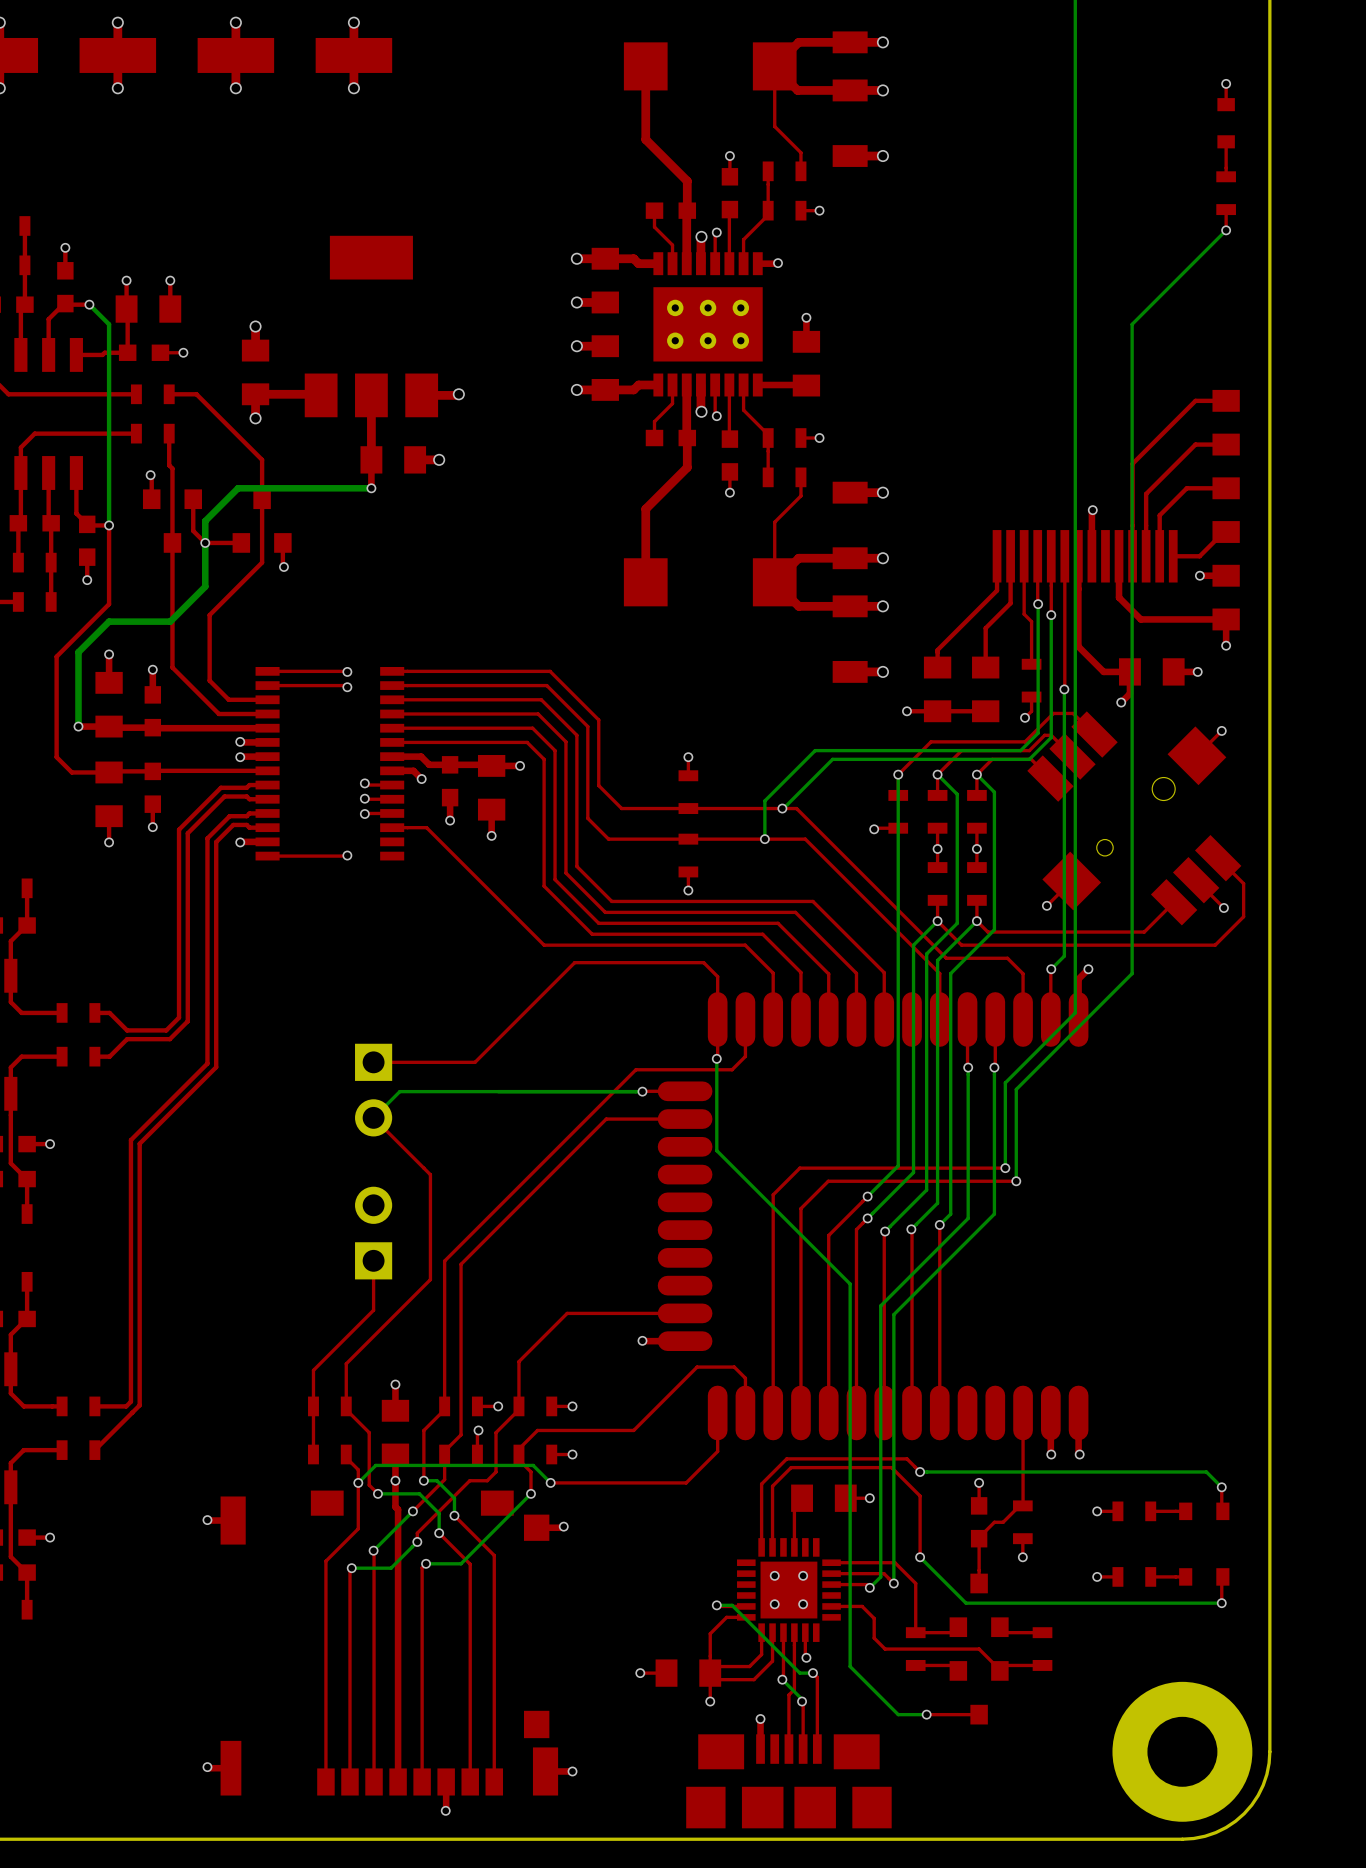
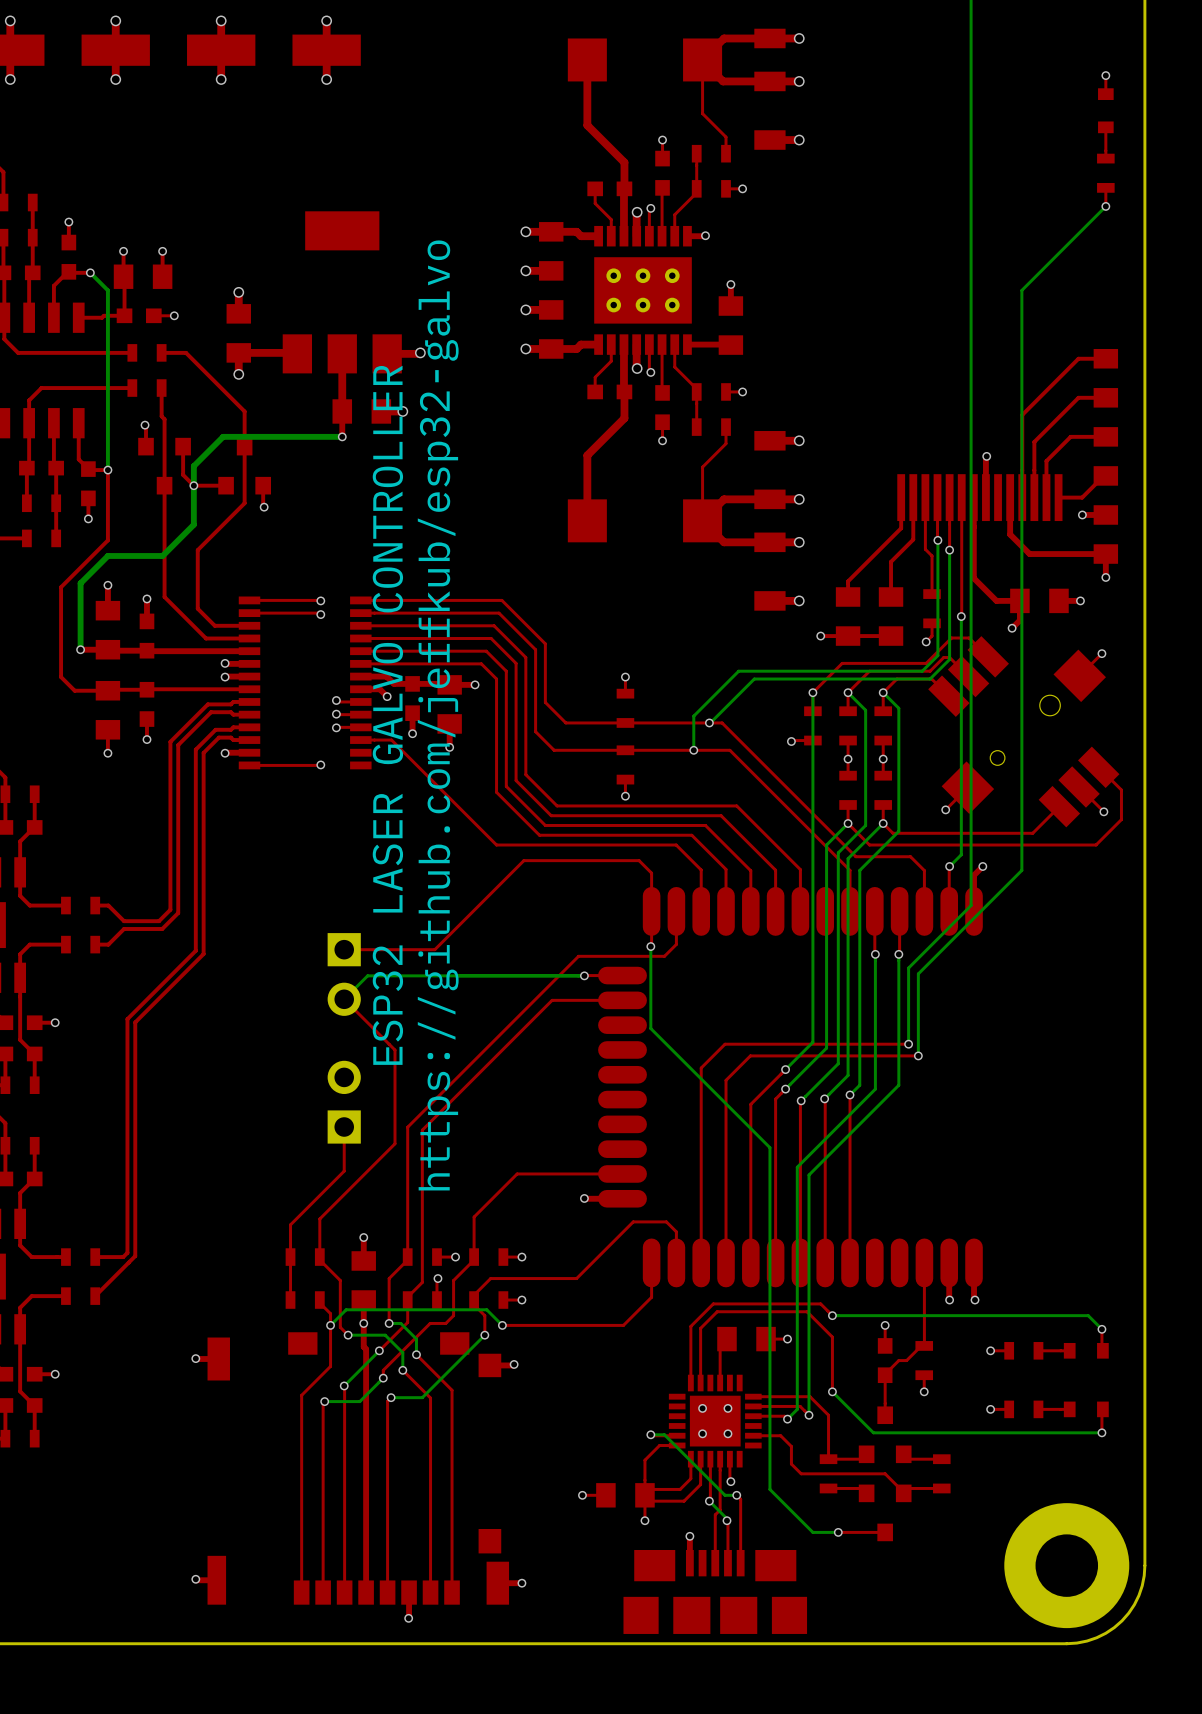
text: none -> ESP32 LASER GALVO CONTROLLER (387, 715)
text: none -> https://github.com/jeffkub/esp32-galvo (438, 715)

